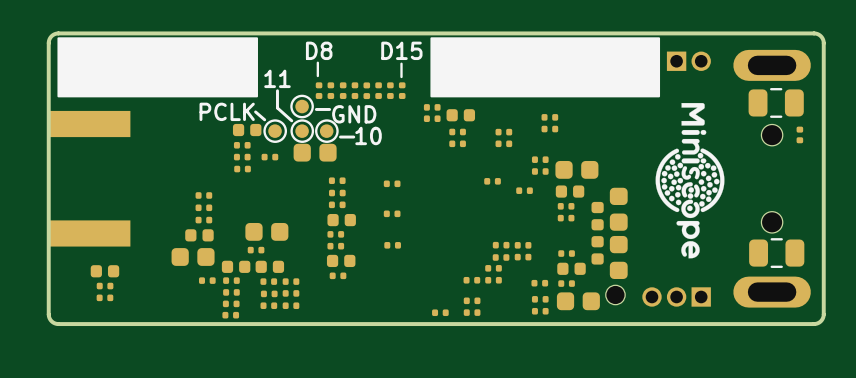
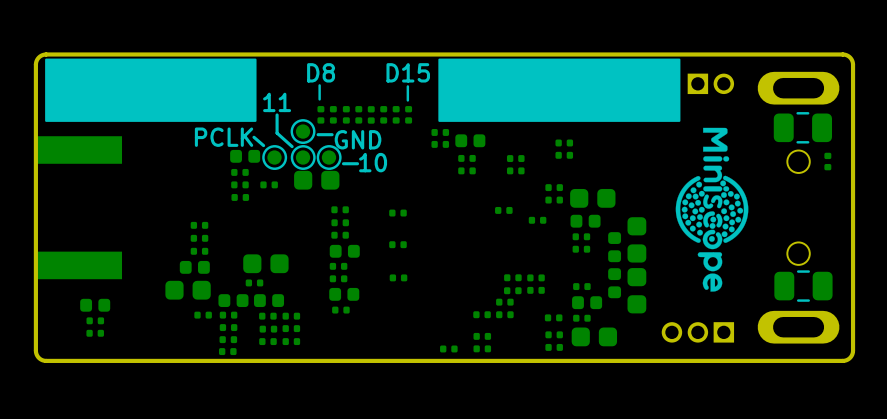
part: (615, 294) -> none

